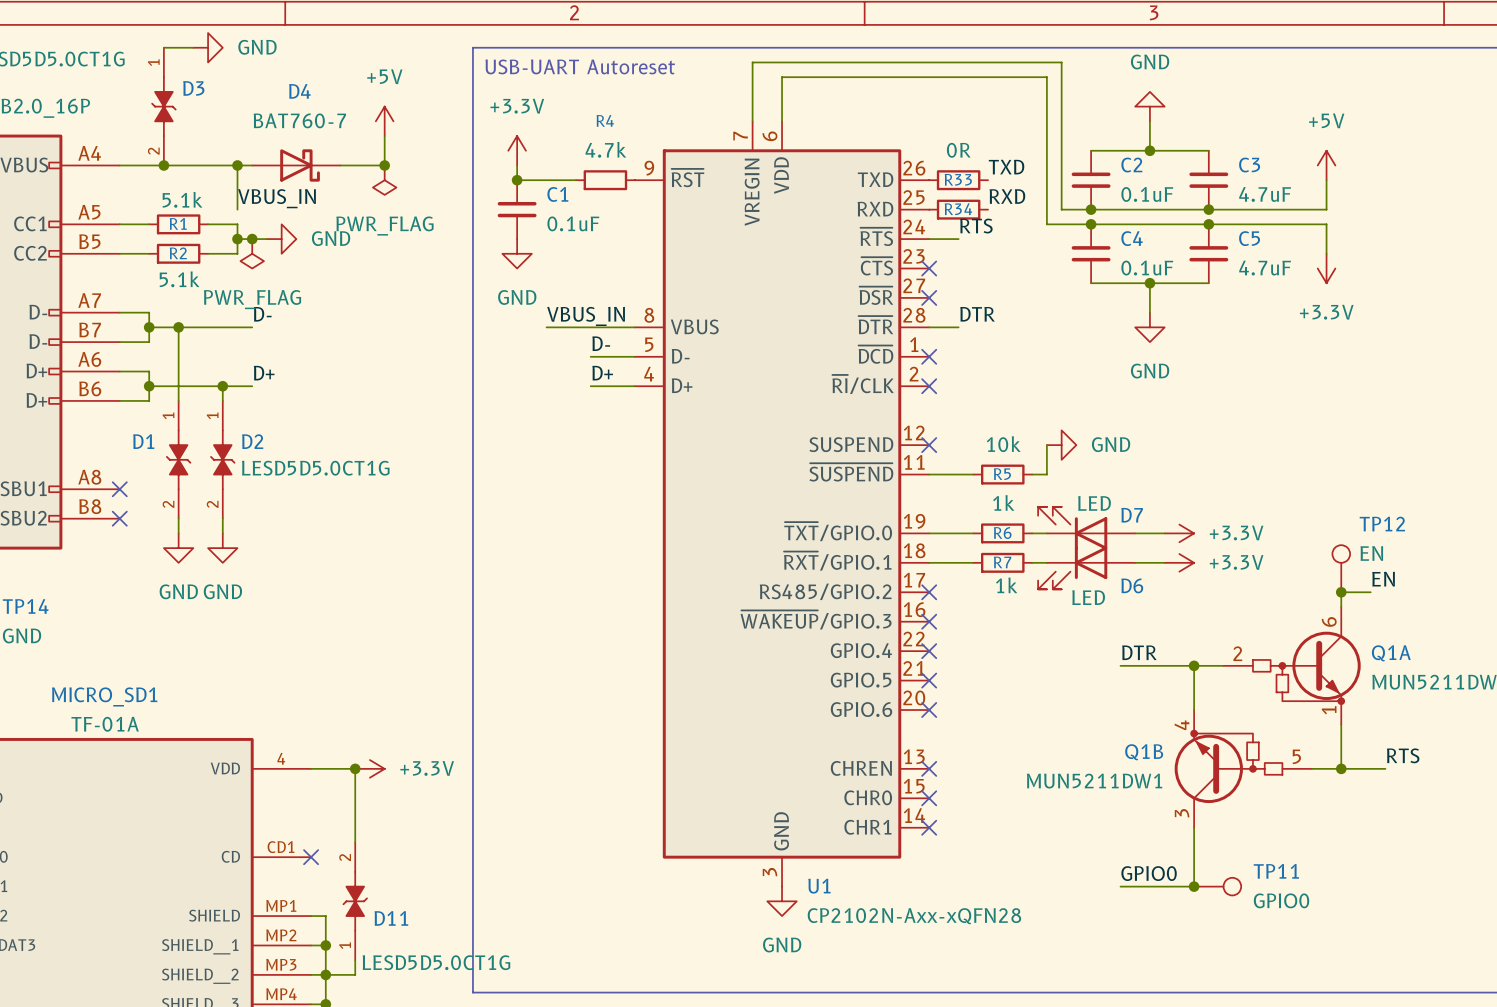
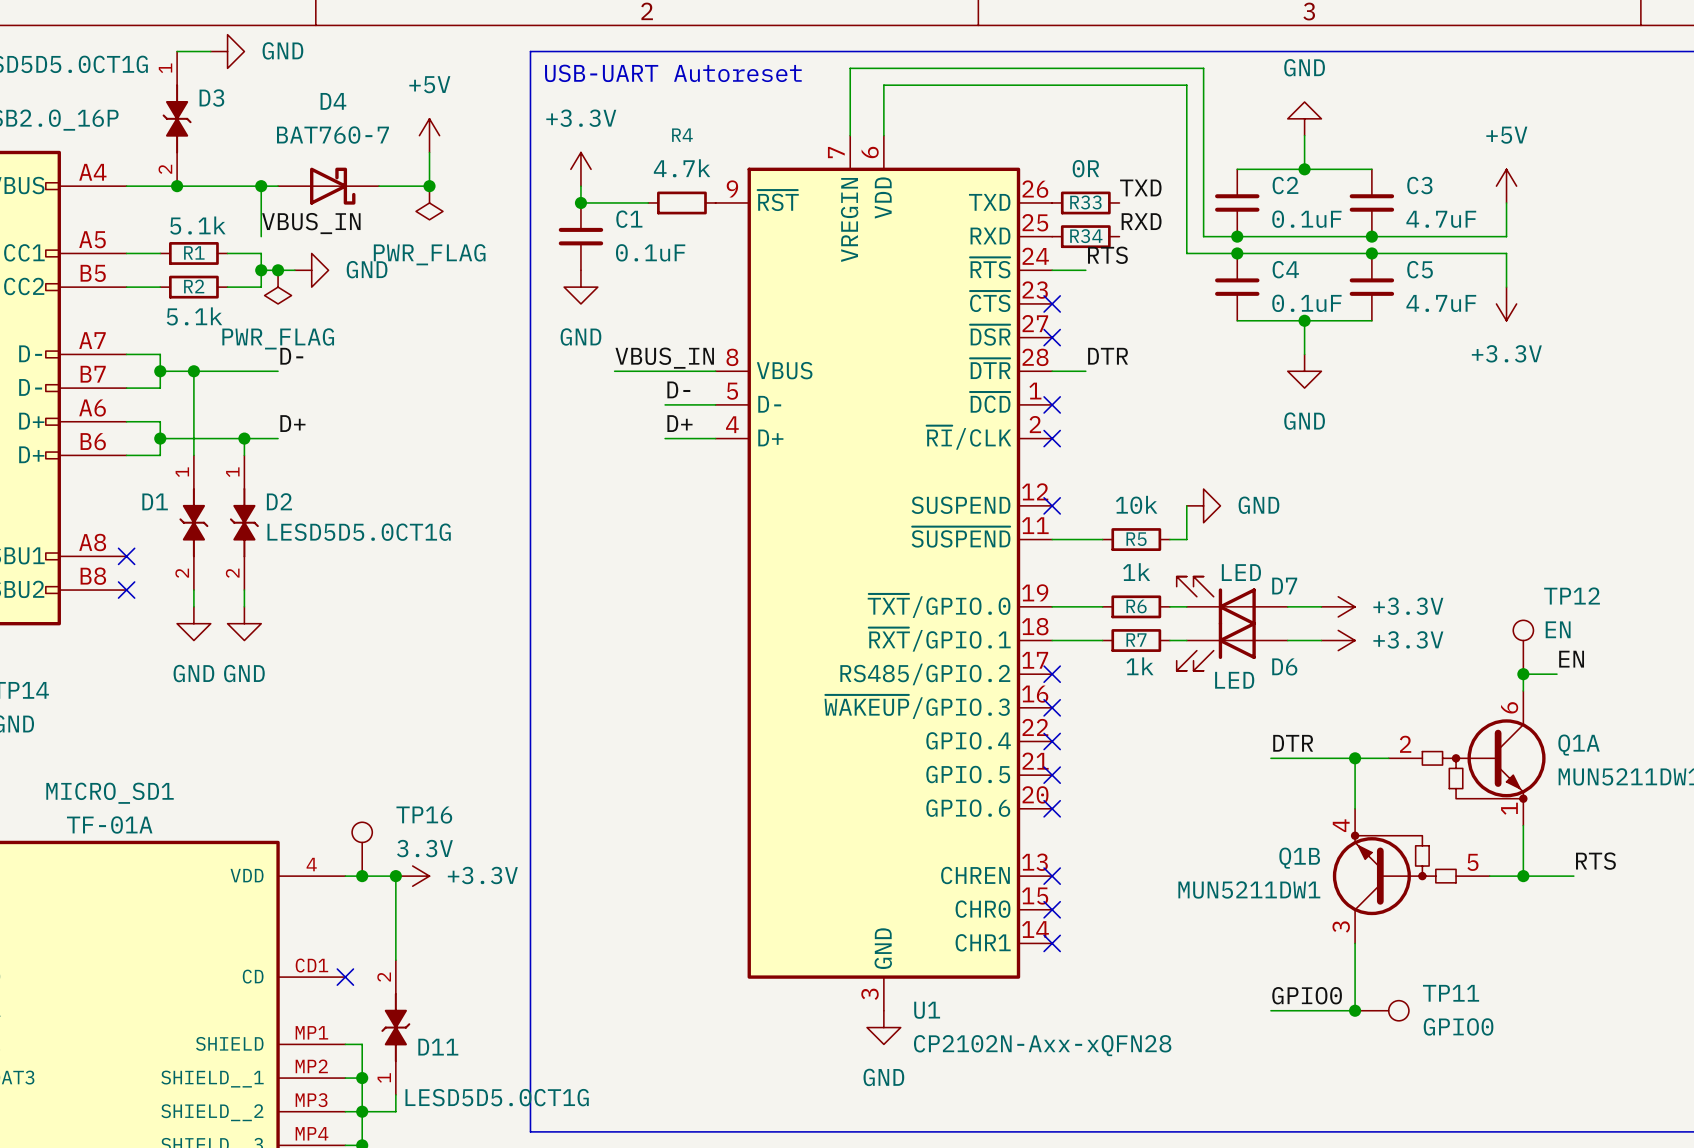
TP16: none -> 3.3V (362, 849)
junction: none -> (362, 876)

